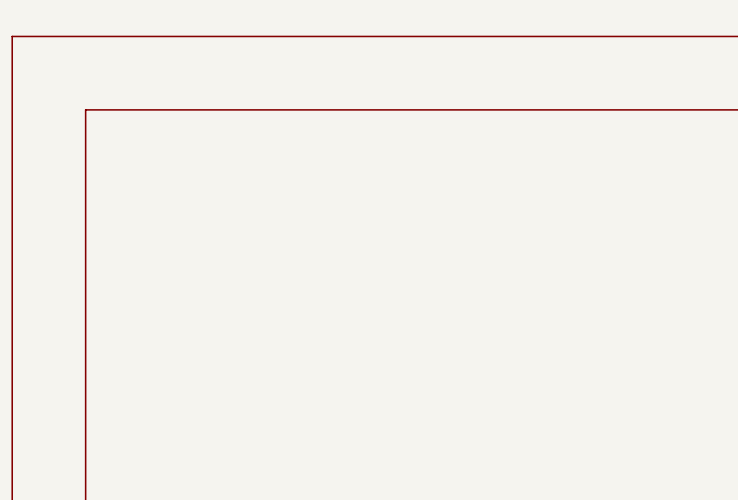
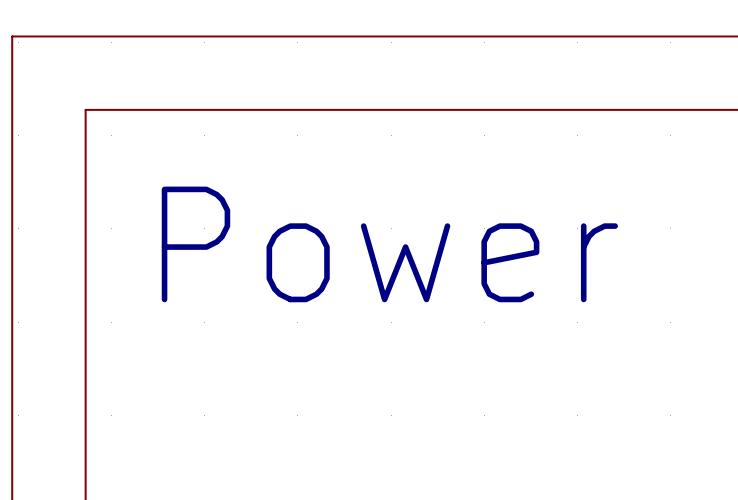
text: none -> Power (389, 244)

